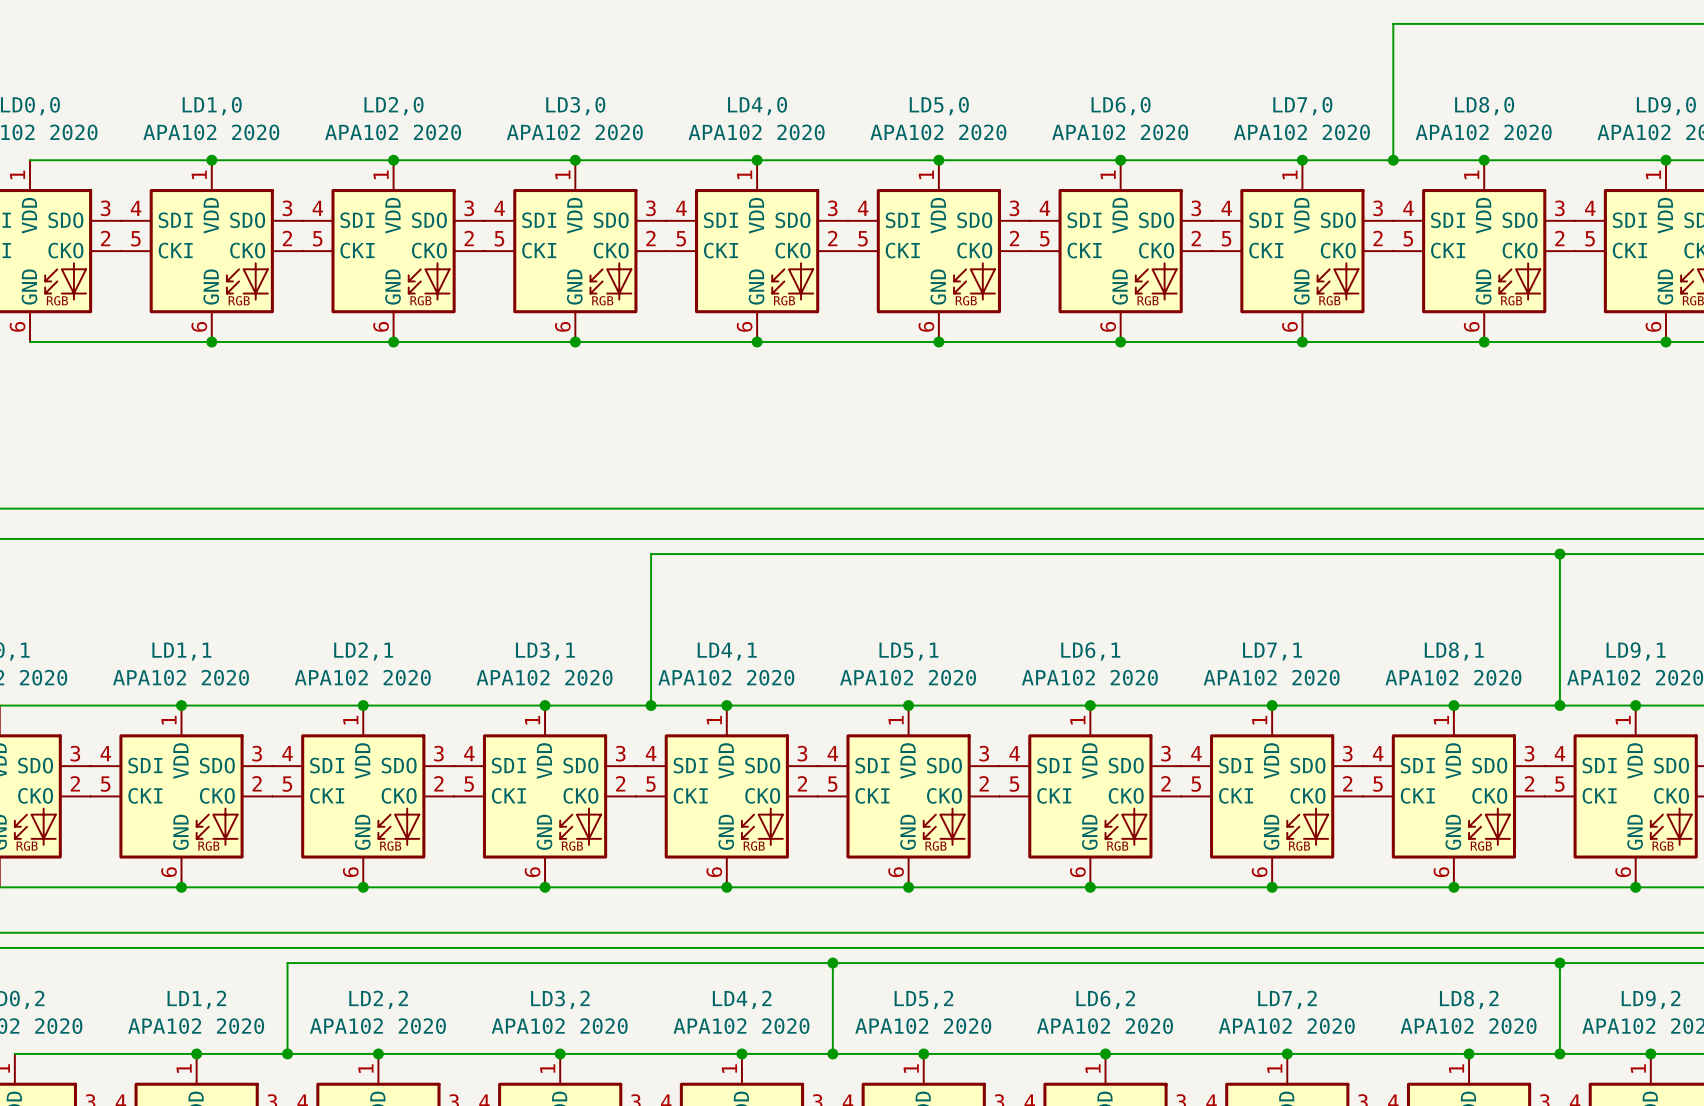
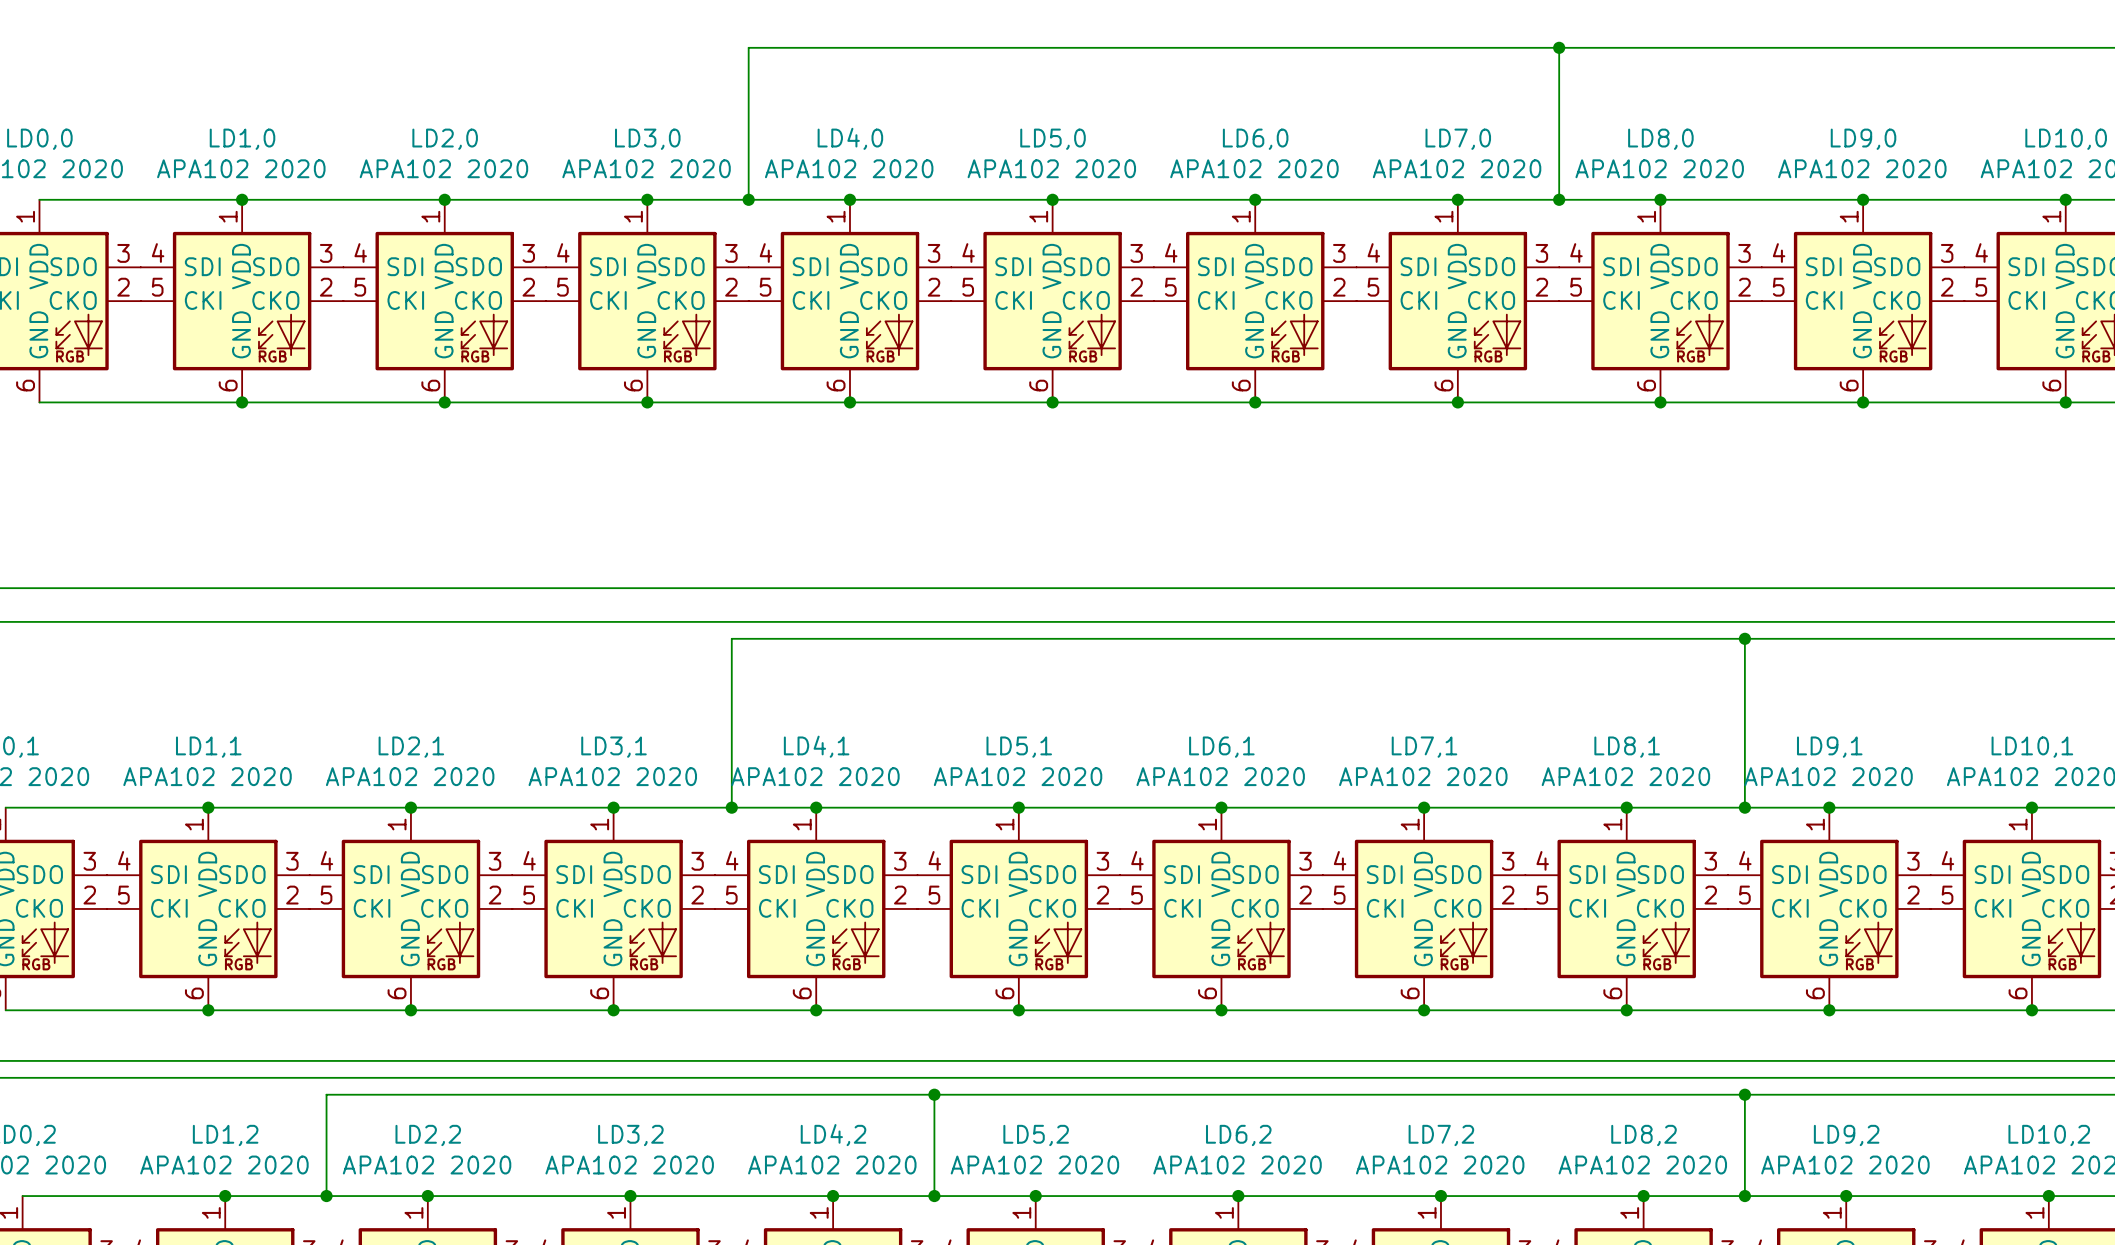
wire: none -> (1559, 47) (748, 47) (748, 199)
junction: none -> (1559, 47)
junction: none -> (748, 199)

